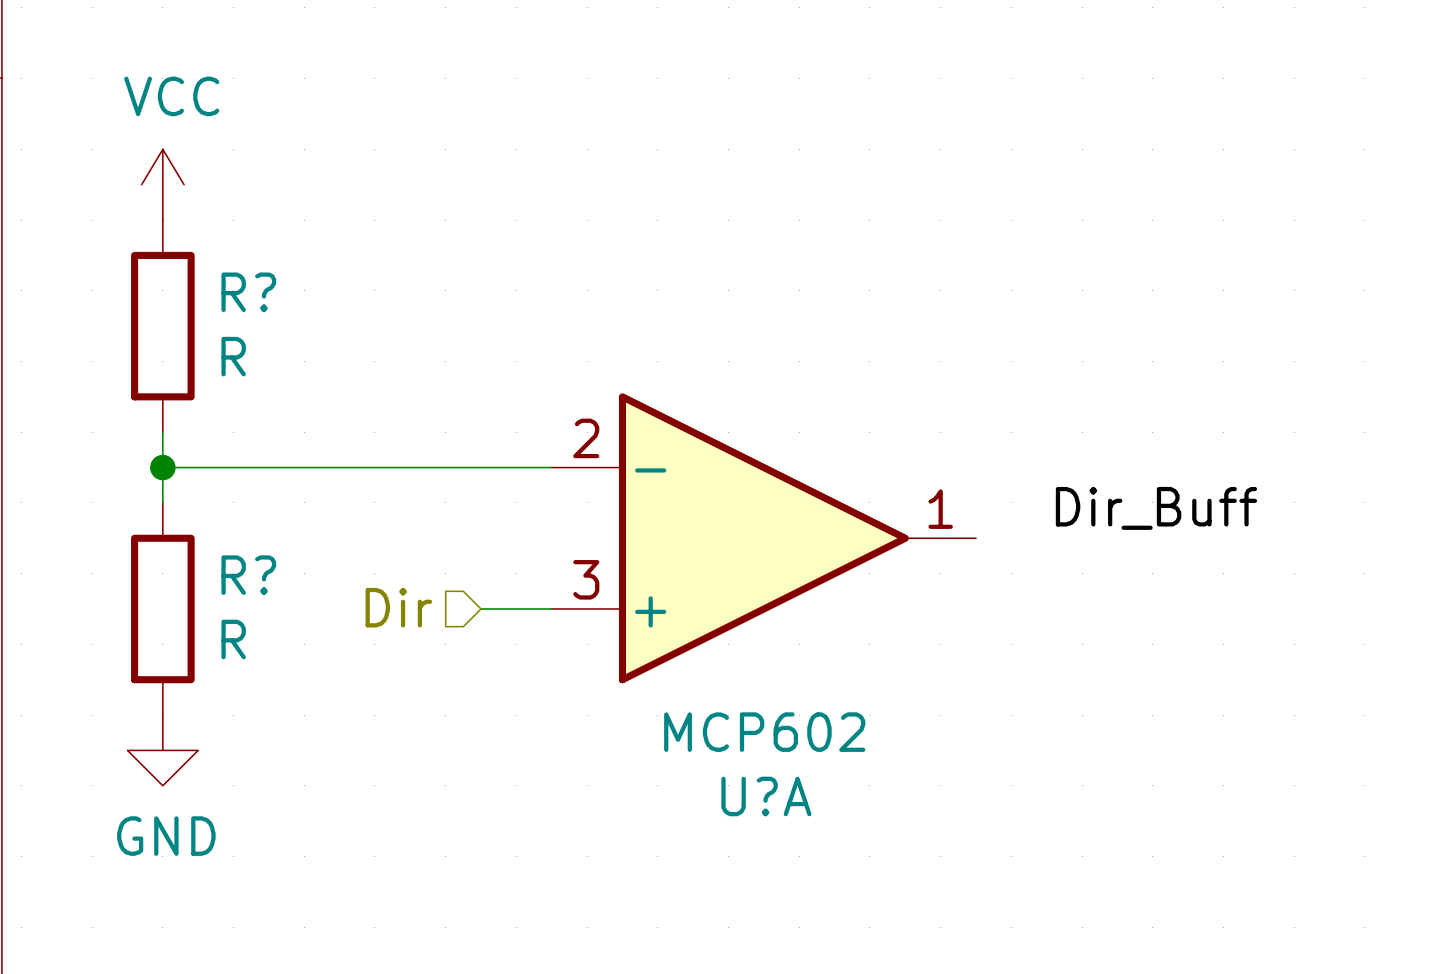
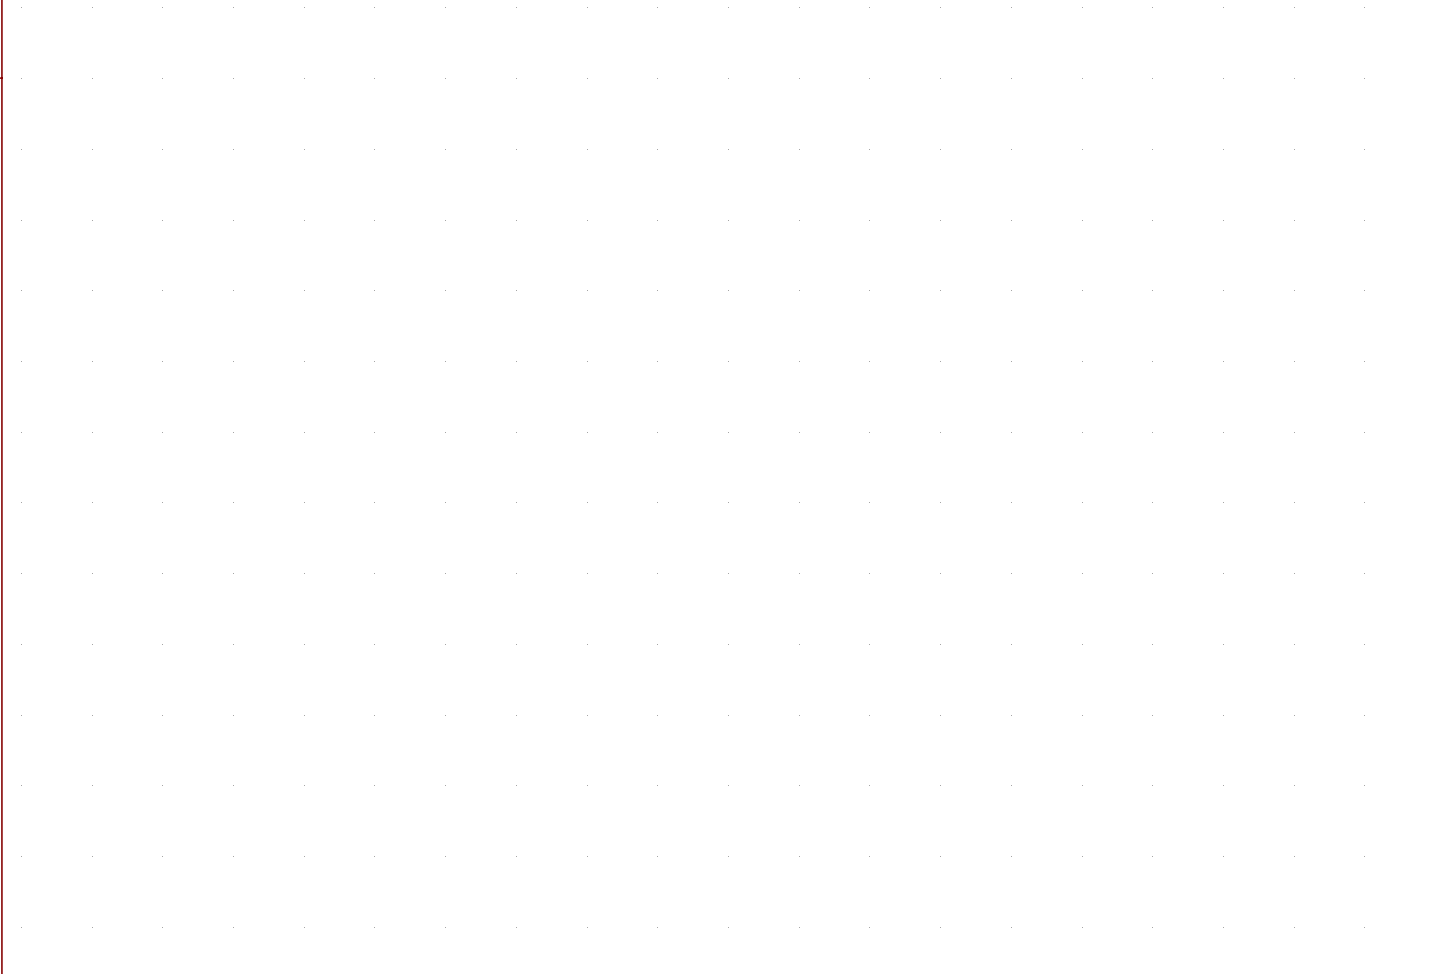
power symbol: VCC (162, 184) -> none
R?: R (162, 326) -> none
wire: (162, 432) (162, 502) -> none
wire: (162, 467) (551, 467) -> none
junction: (162, 467) -> none
label: Dir_Buff (1156, 508) -> none
U?A: MCP602 (763, 538) -> none
hierarchical label: Dir (398, 607) -> none
R?: R (162, 608) -> none
wire: (481, 608) (551, 608) -> none
power symbol: GND (162, 750) -> none

